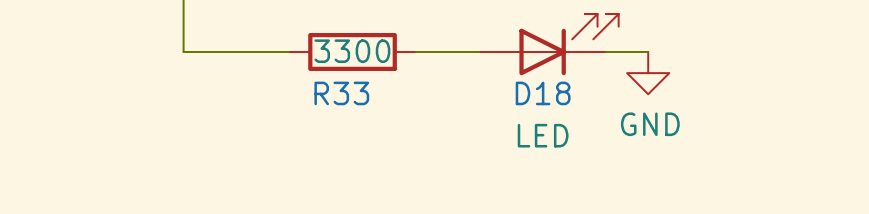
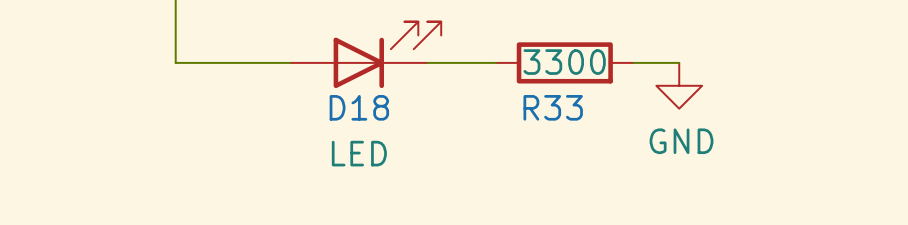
D18 position: (548, 44) -> (365, 54)
R33 position: (352, 51) -> (564, 62)

